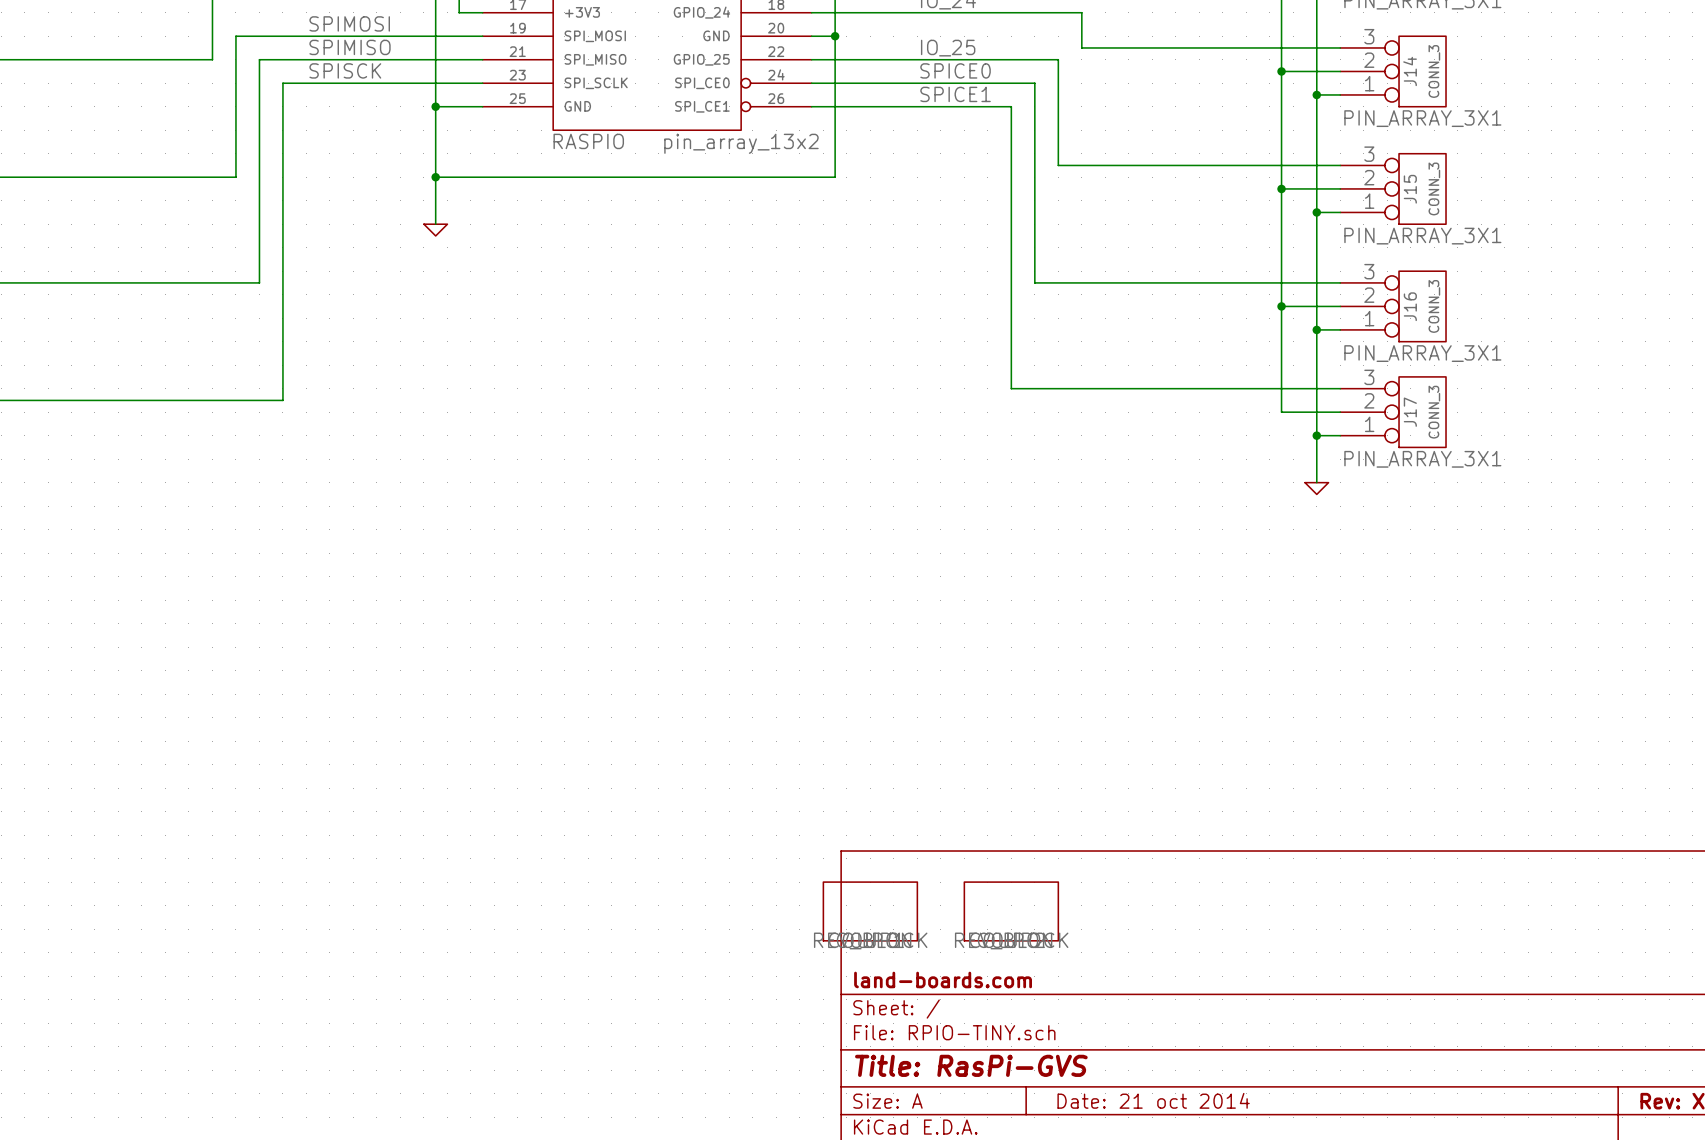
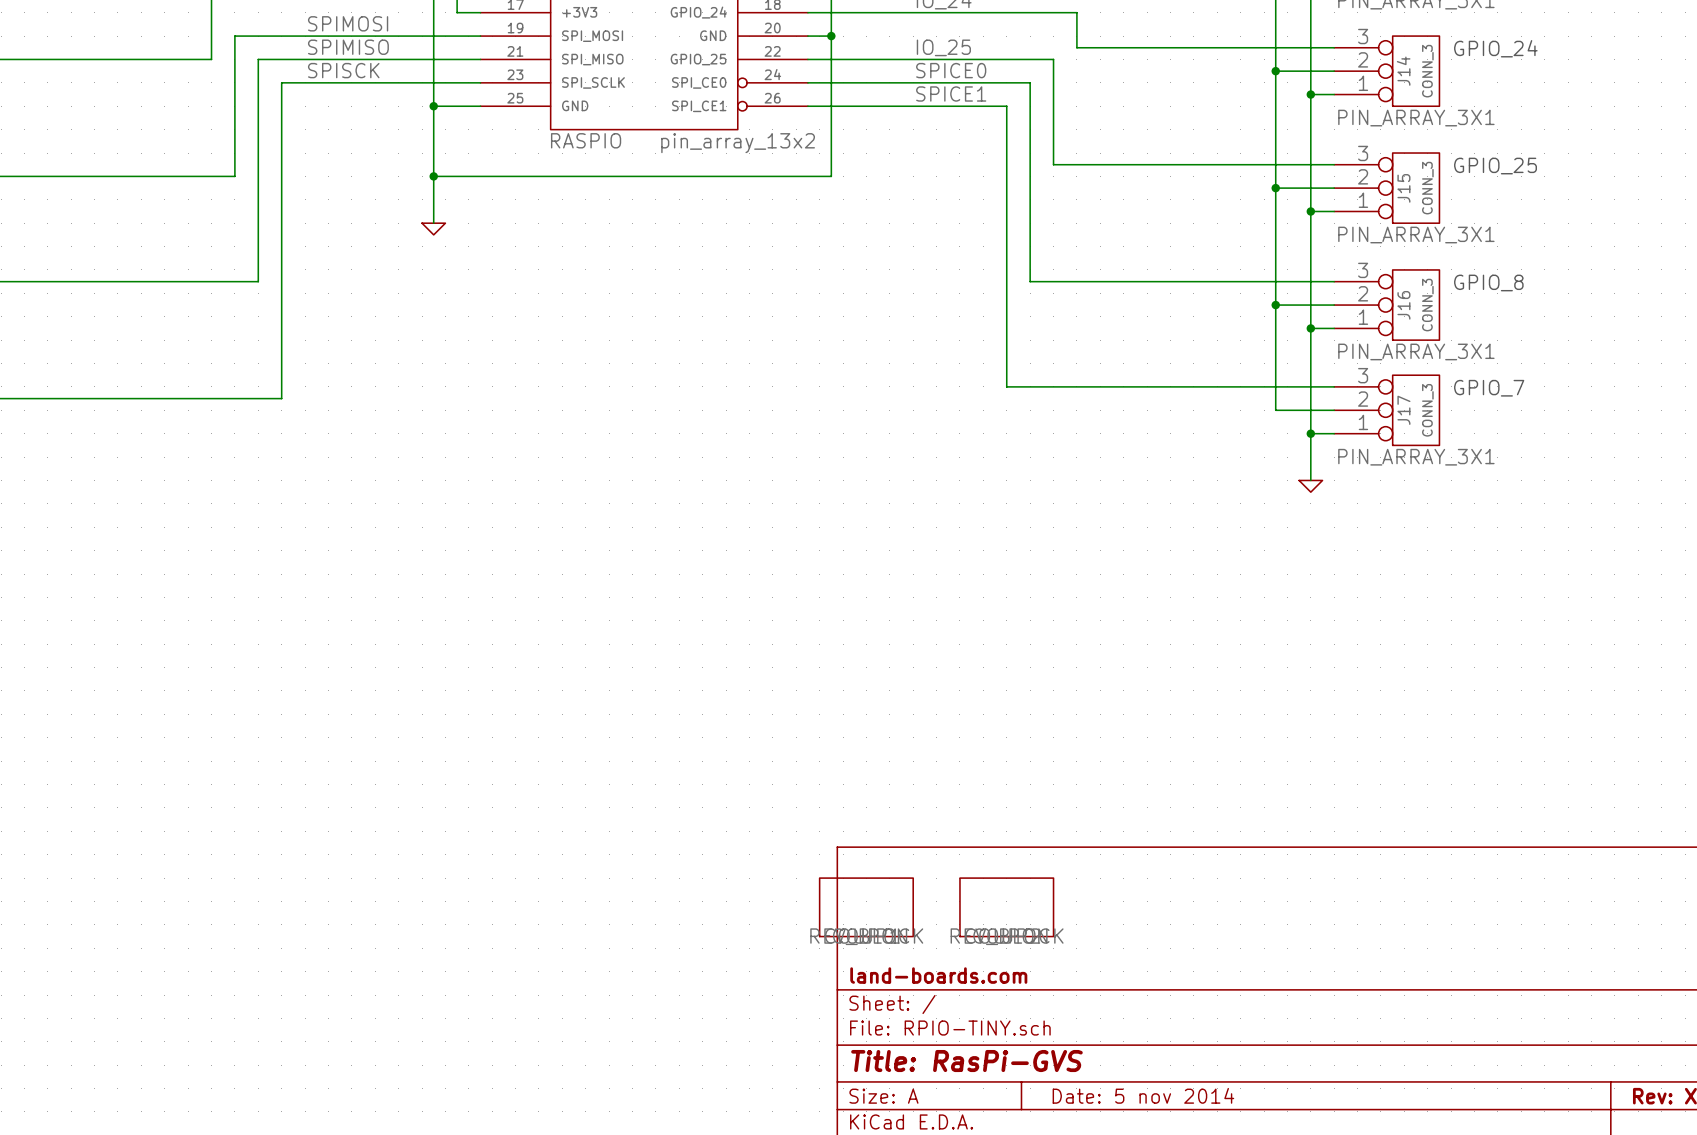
text: none -> GPIO_24 (1495, 48)
text: none -> GPIO_25 (1495, 166)
text: none -> GPIO_8 (1488, 282)
text: none -> GPIO_7 (1489, 388)
title block: Date: 21 oct 2014 (1153, 1100) -> Date: 5 nov 2014 (1143, 1095)

